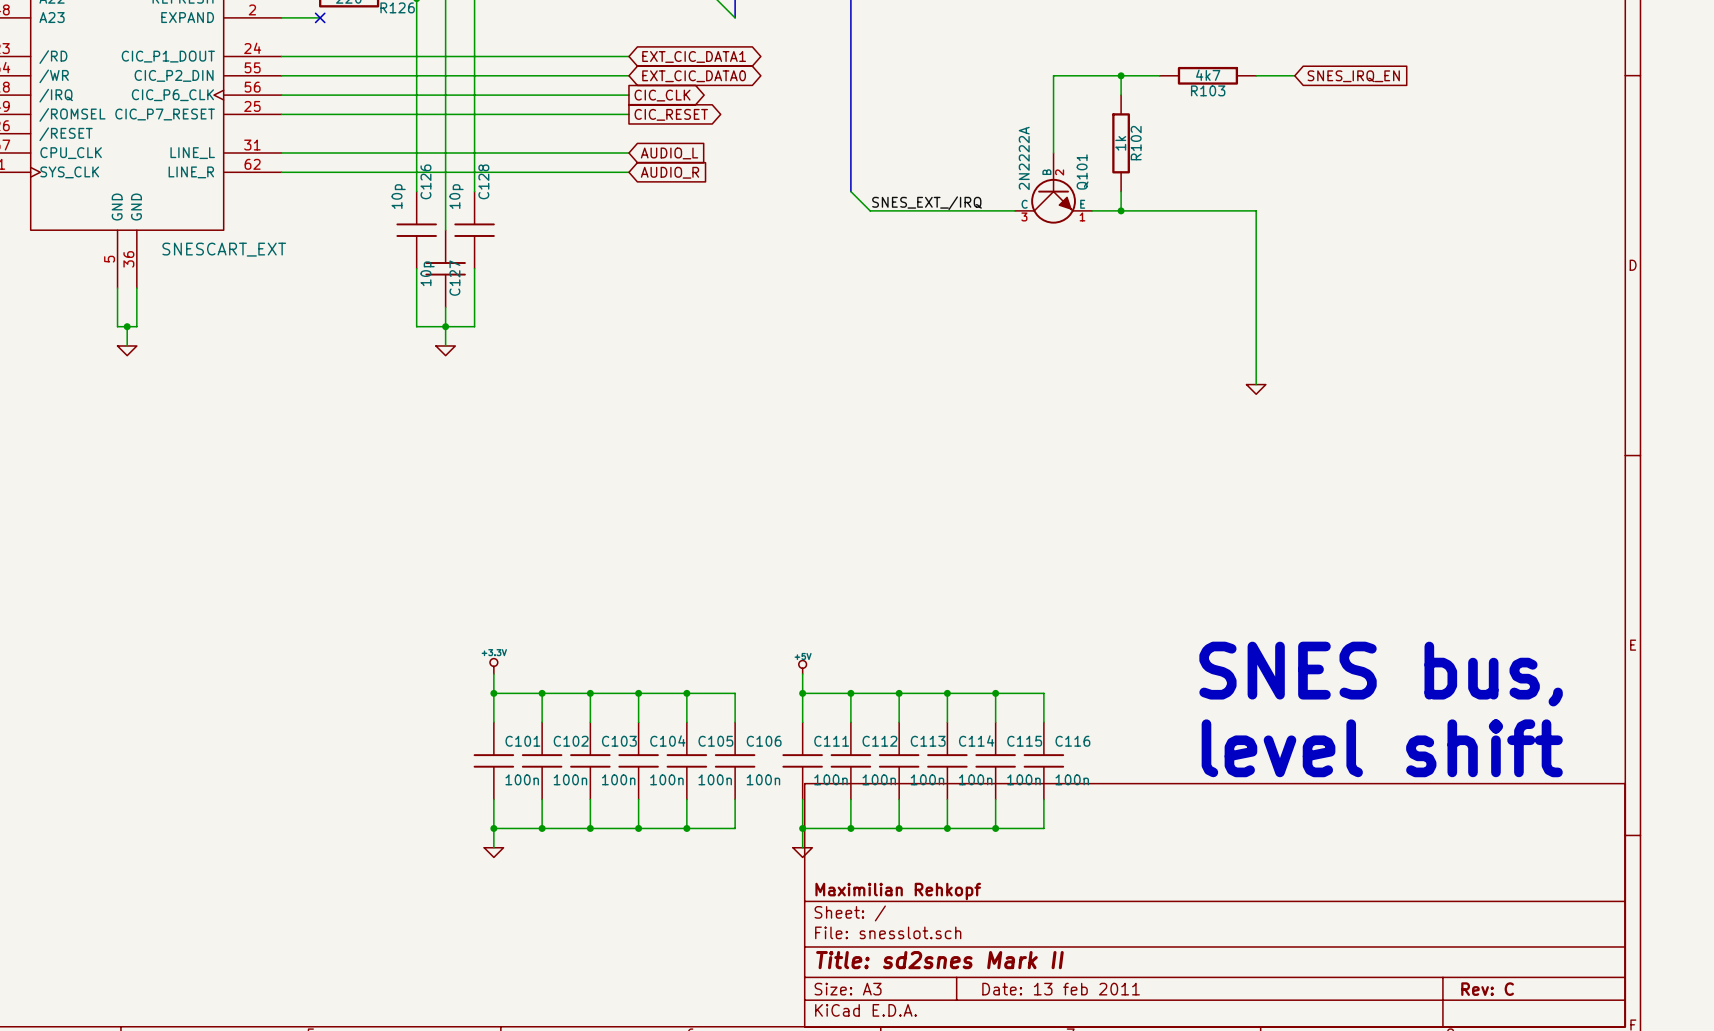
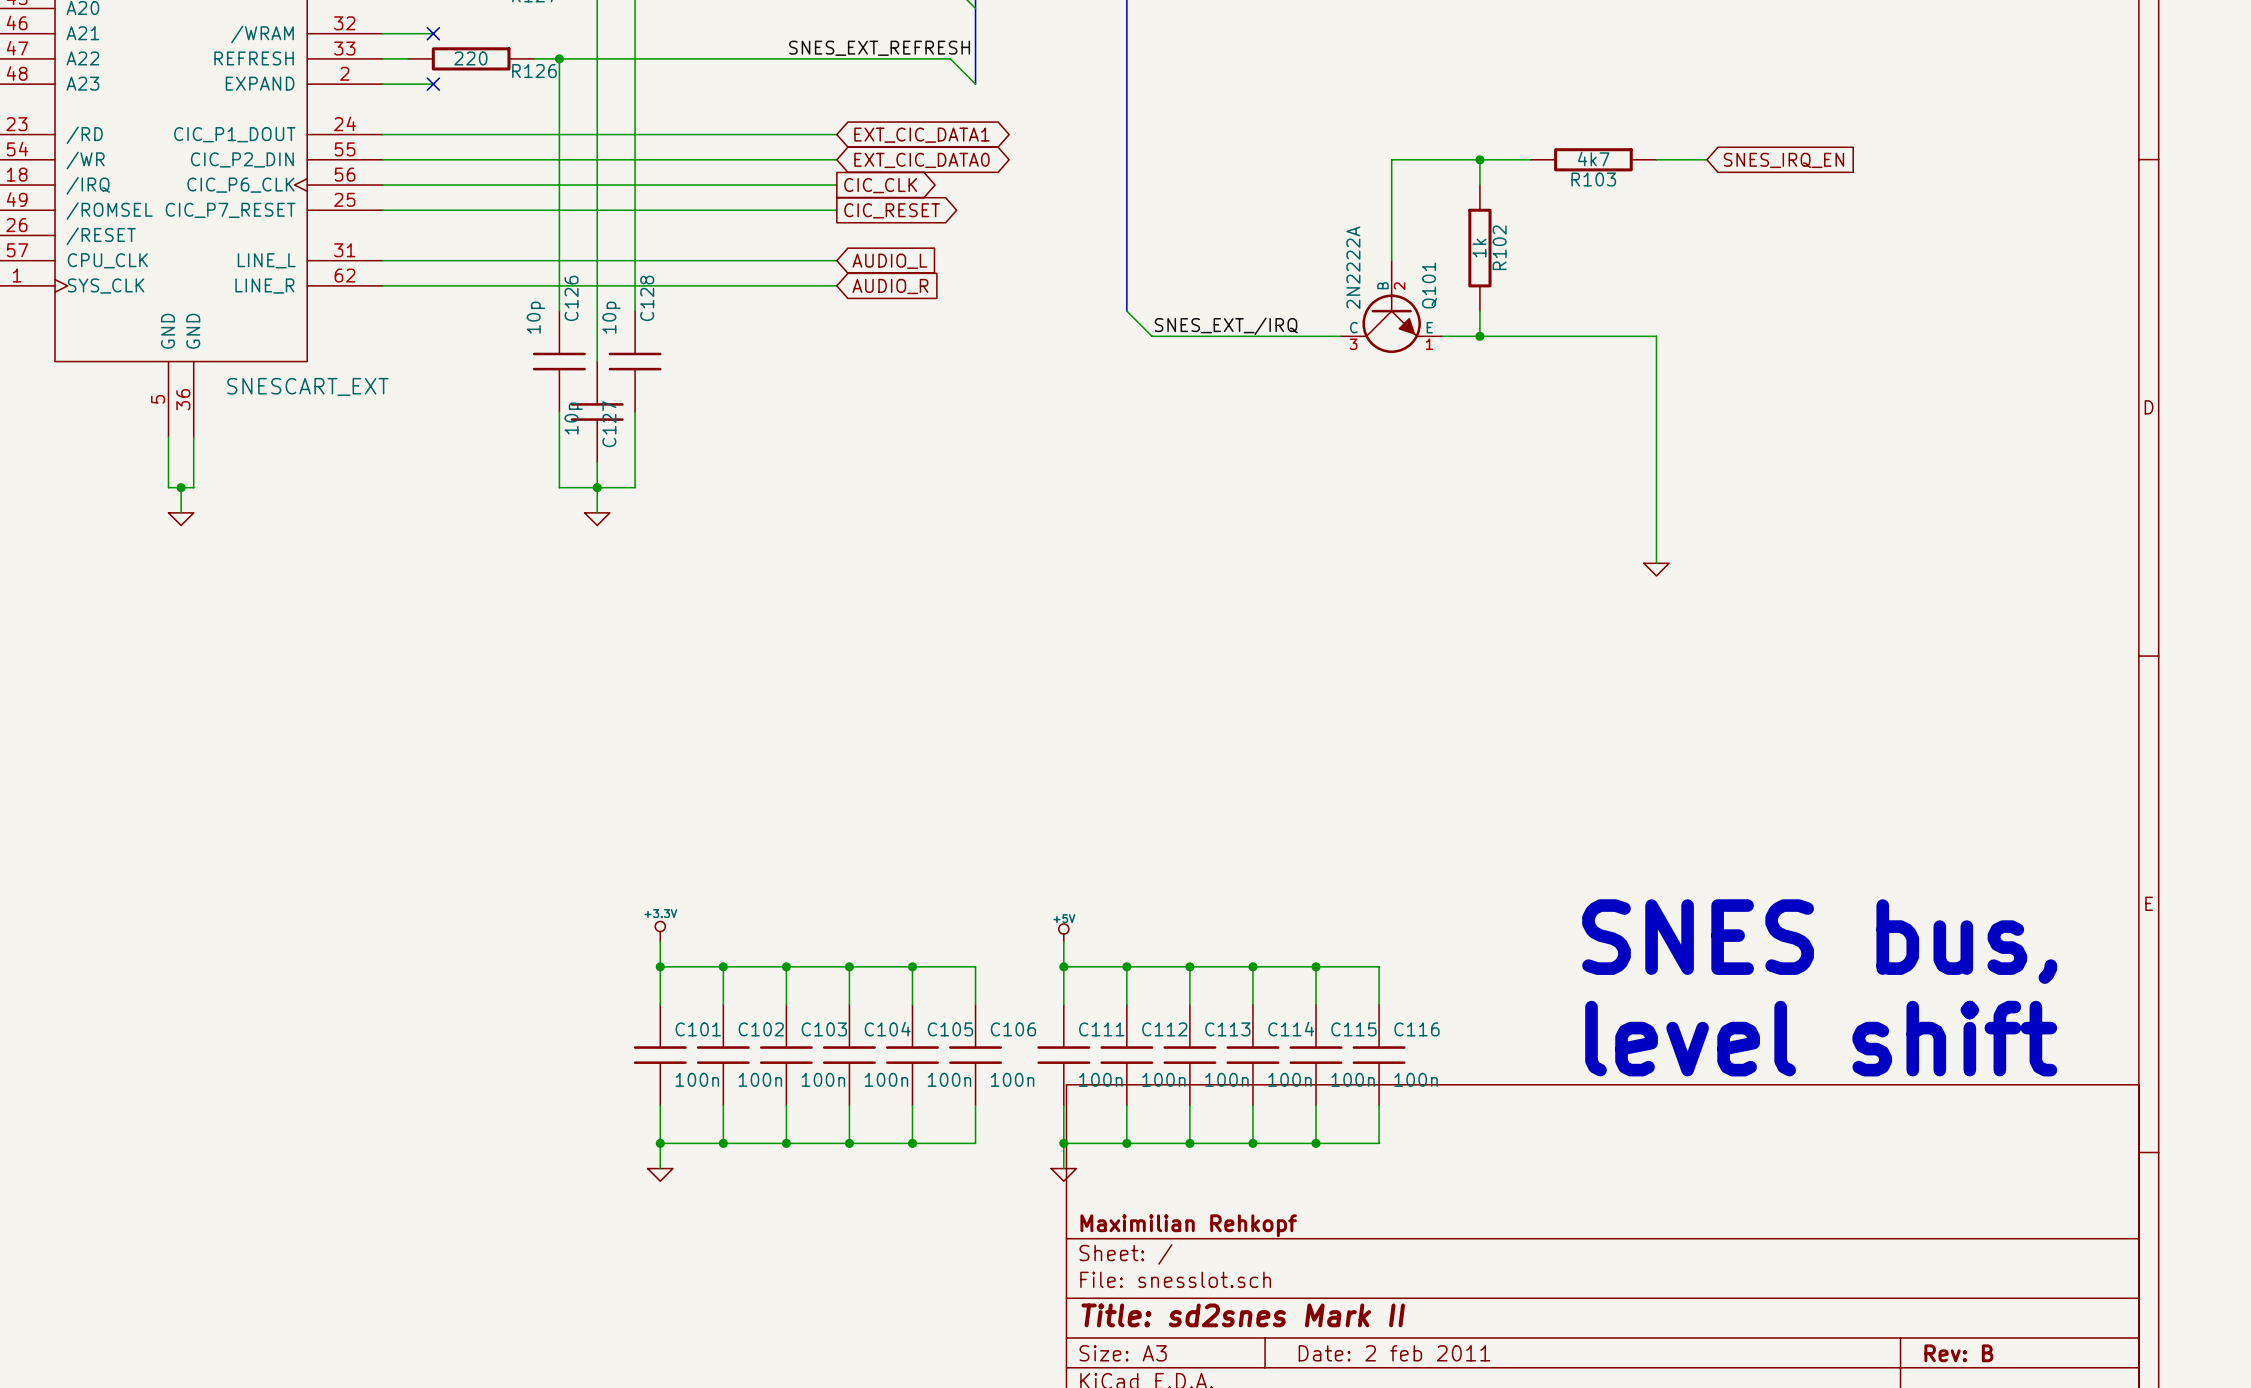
title block: Date: 13 feb 2011 (1061, 989) -> Date: 2 feb 2011 (1394, 1353)
title block: Rev: C (1487, 989) -> Rev: B (1958, 1353)

